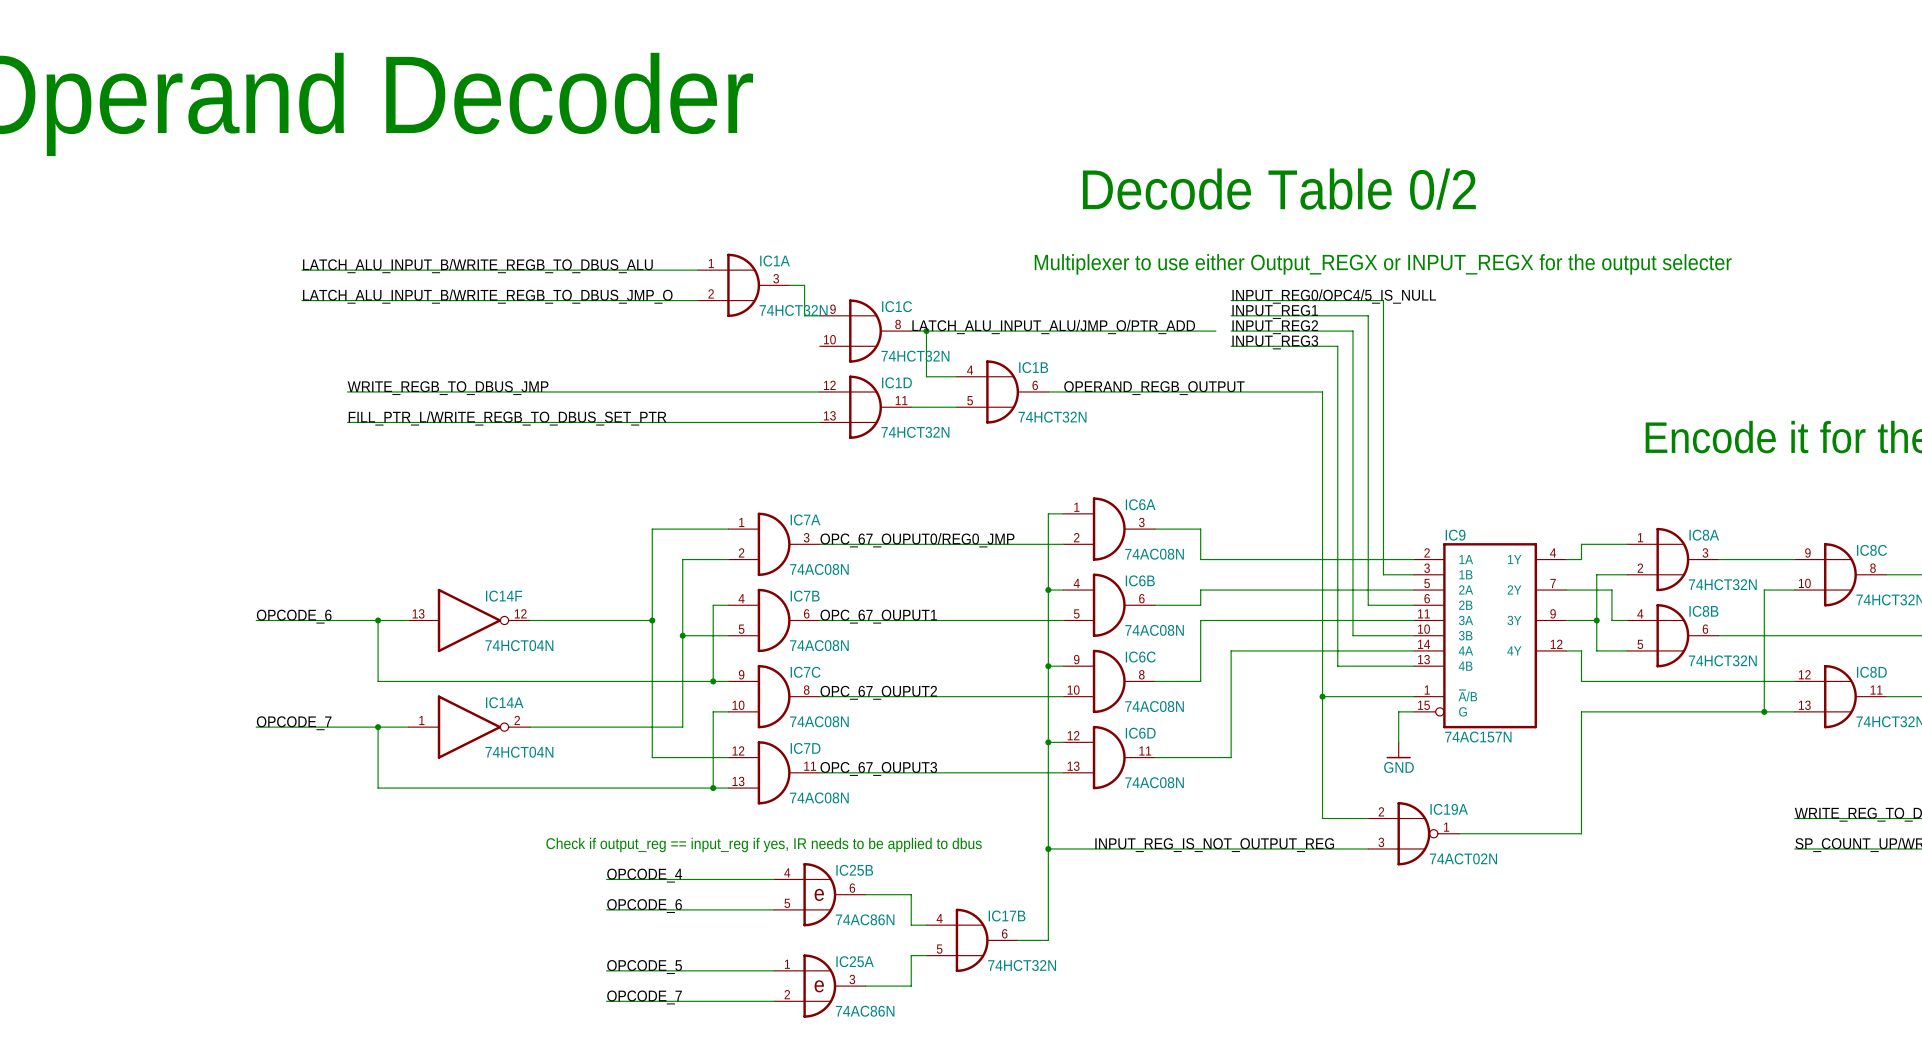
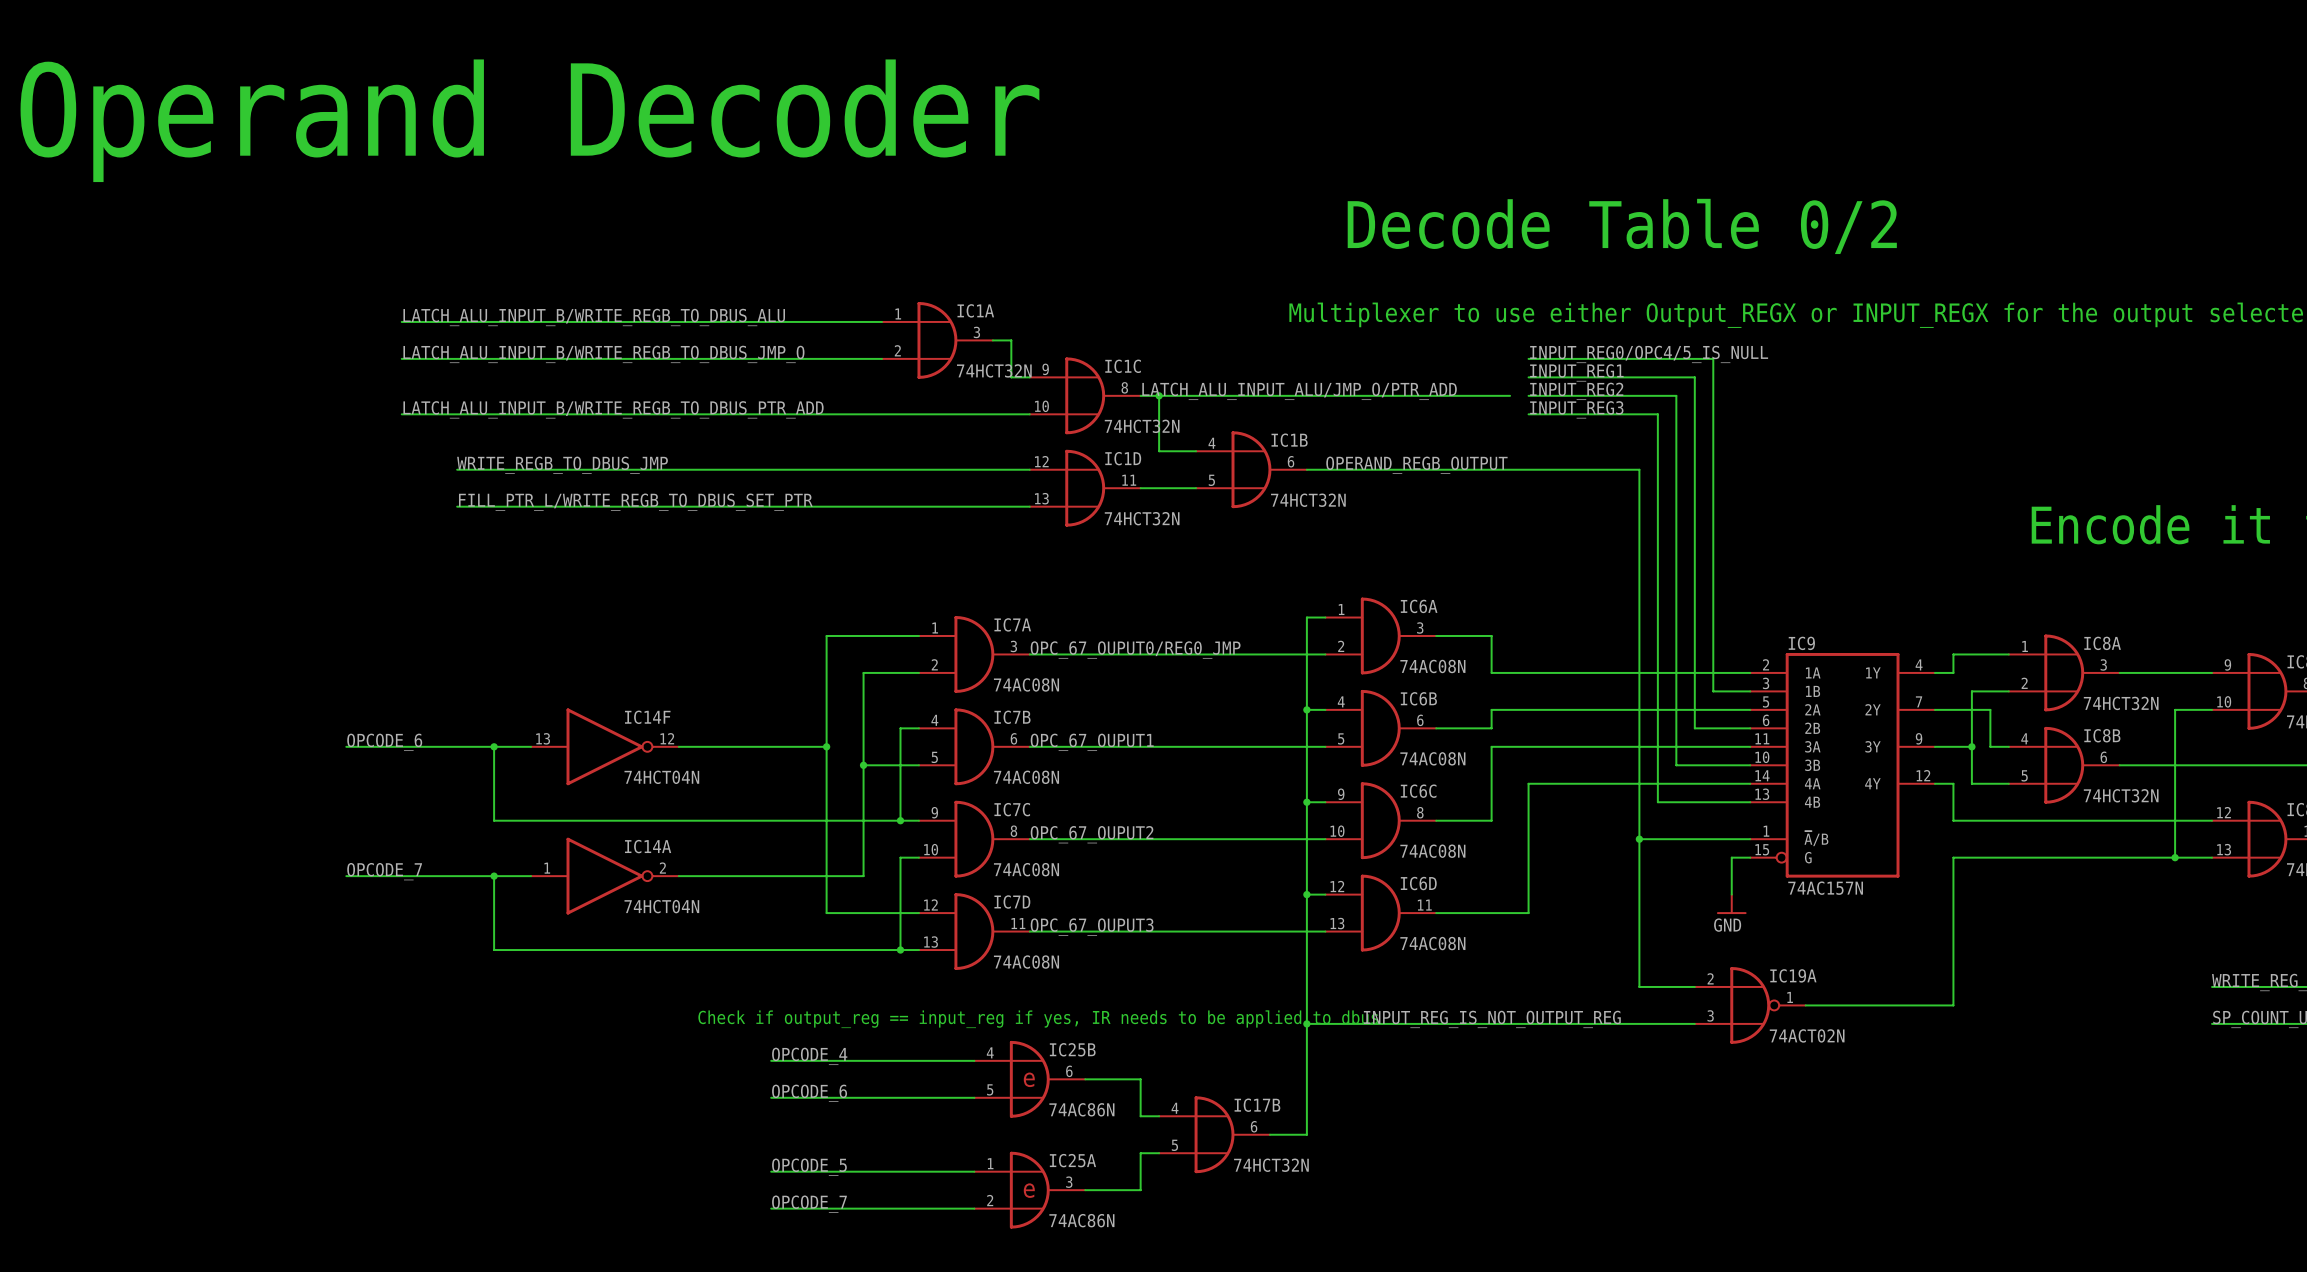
label: none -> LATCH_ALU_INPUT_B/WRITE_REGB_TO_DBUS_PTR_ADD (613, 409)
wire: none -> (401, 414) (1029, 414)

